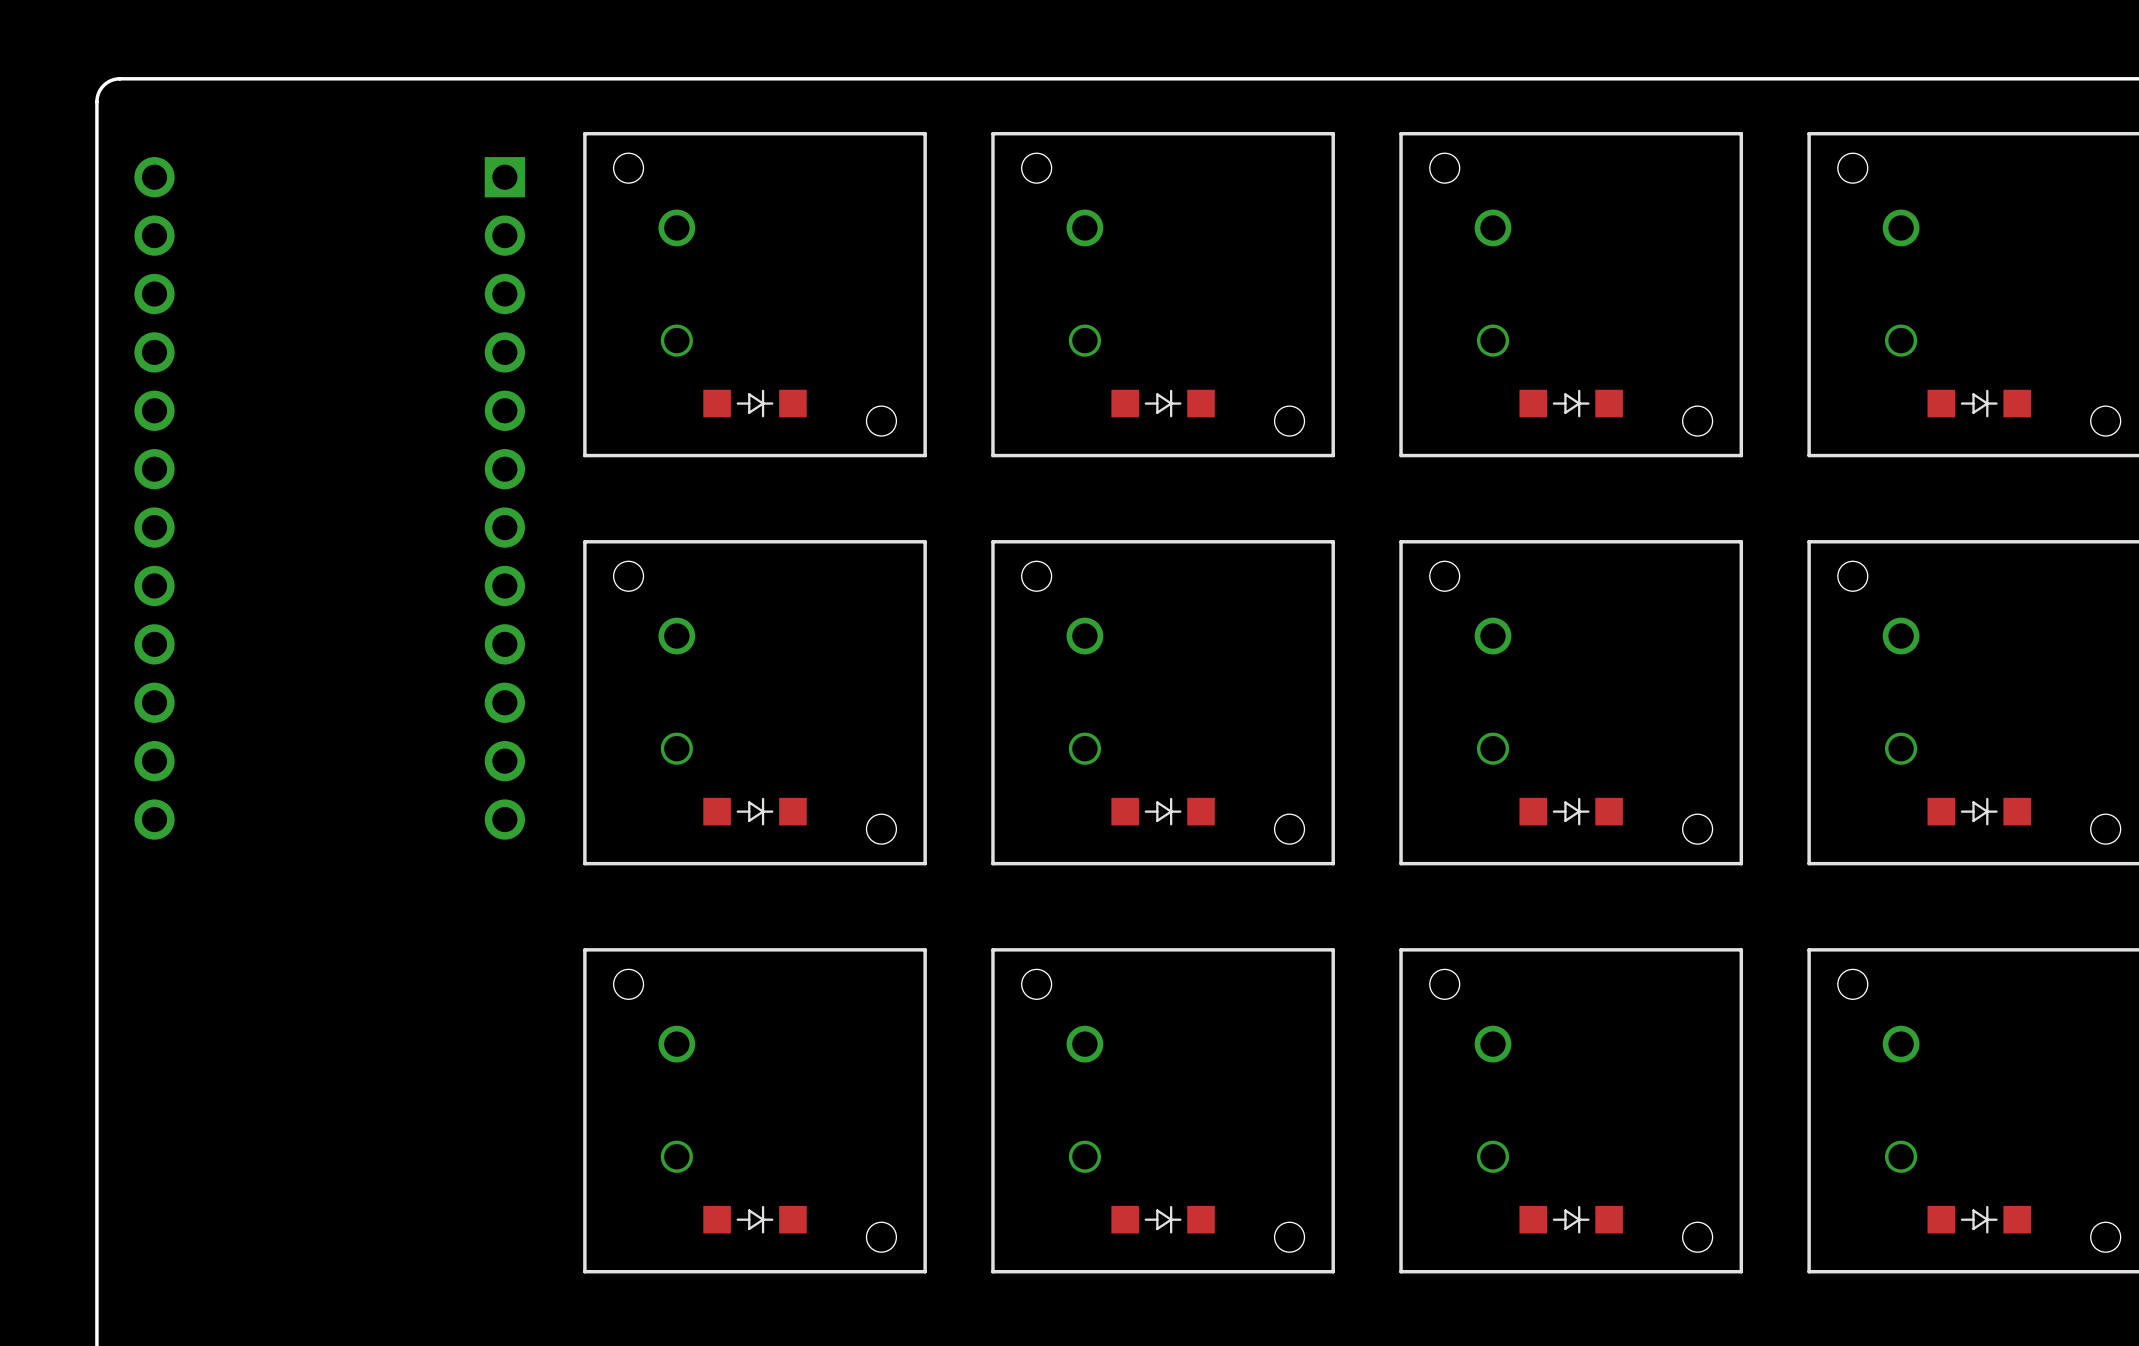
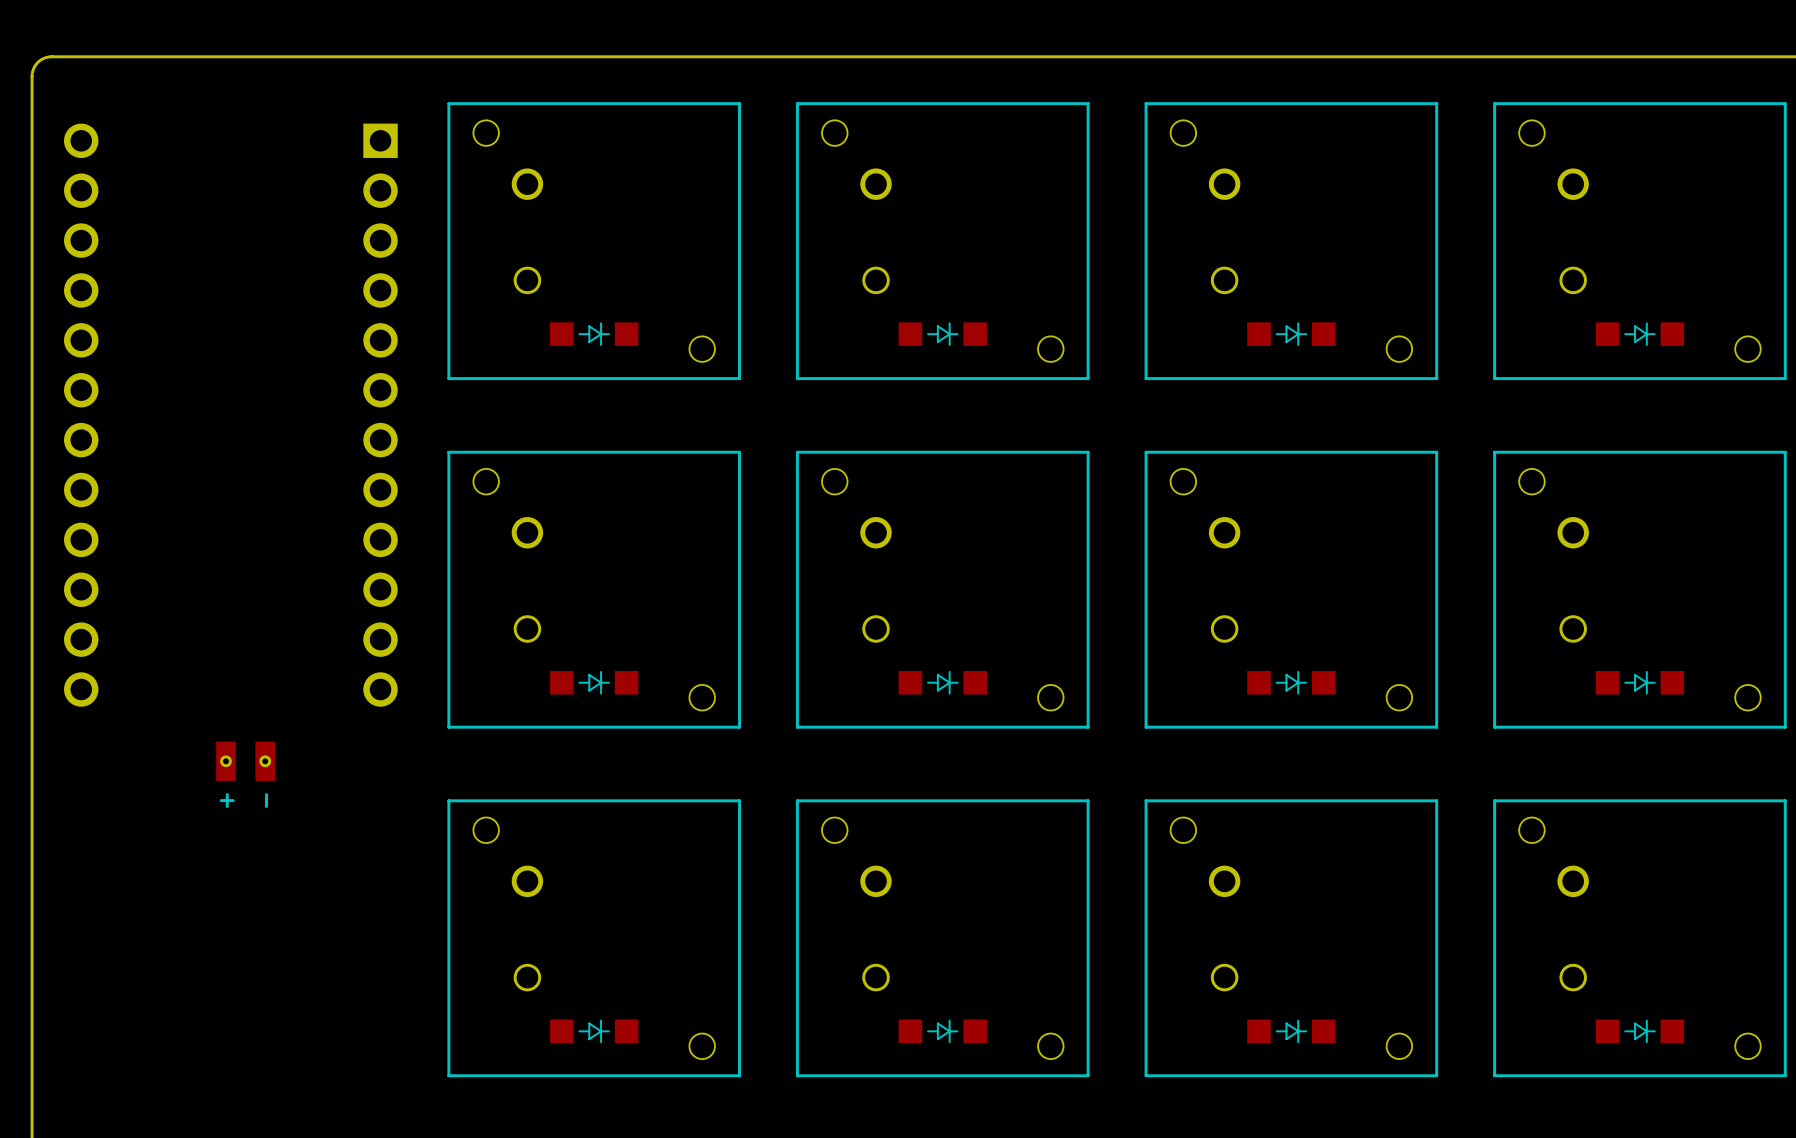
part: none -> (225, 761)
part: none -> (225, 761)
part: none -> (265, 761)
part: none -> (265, 761)

